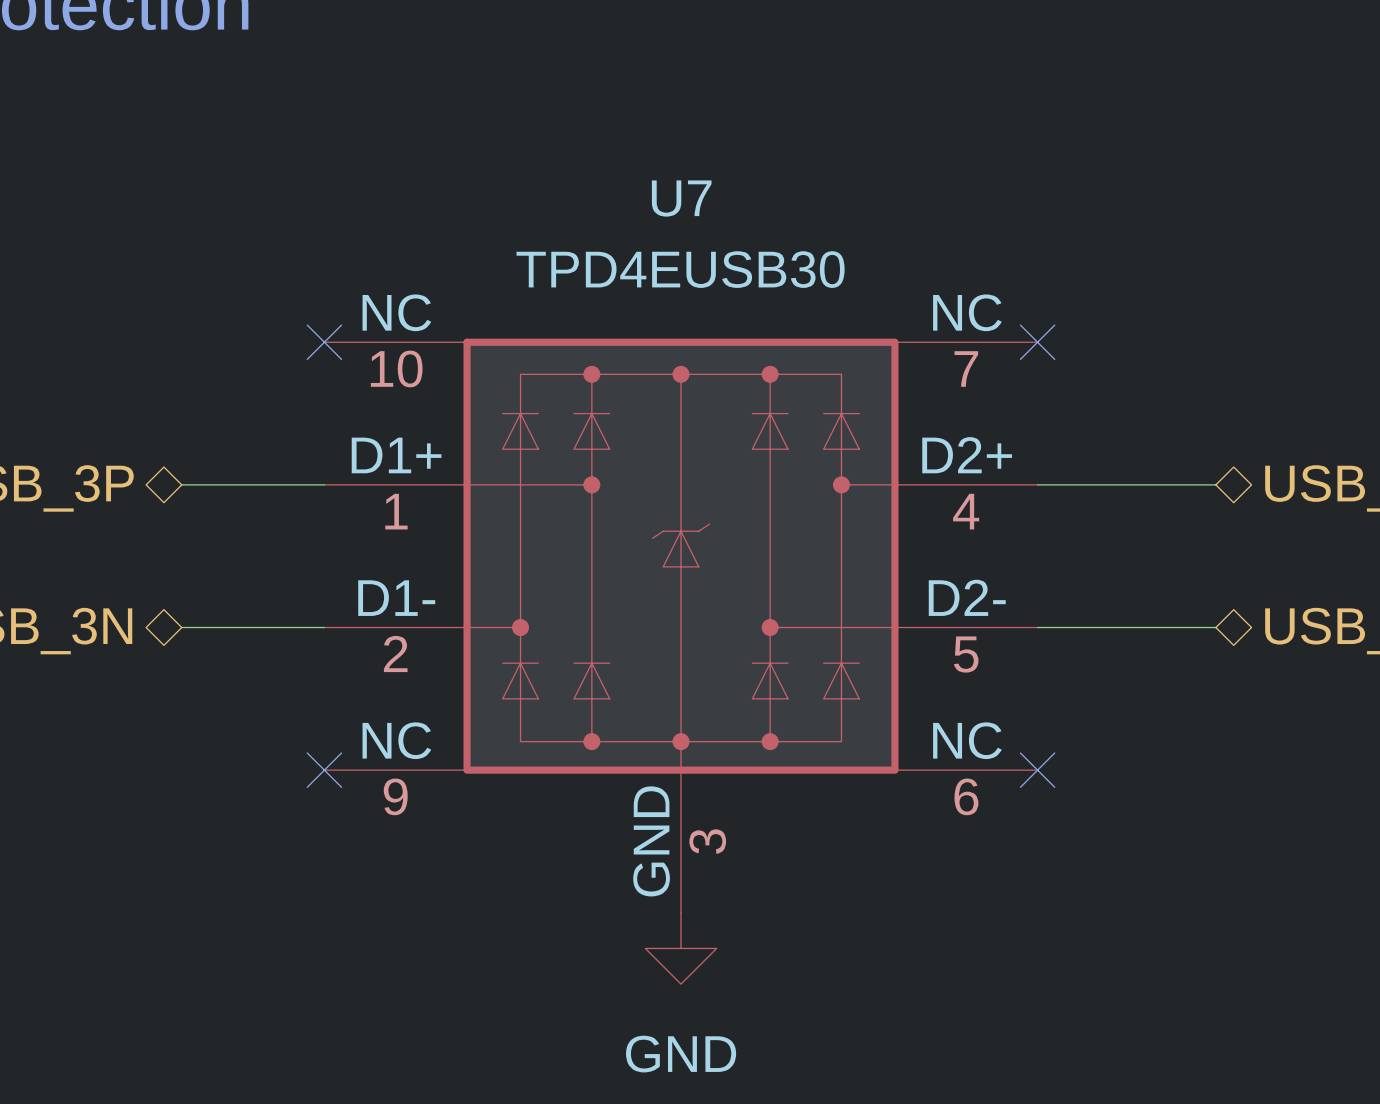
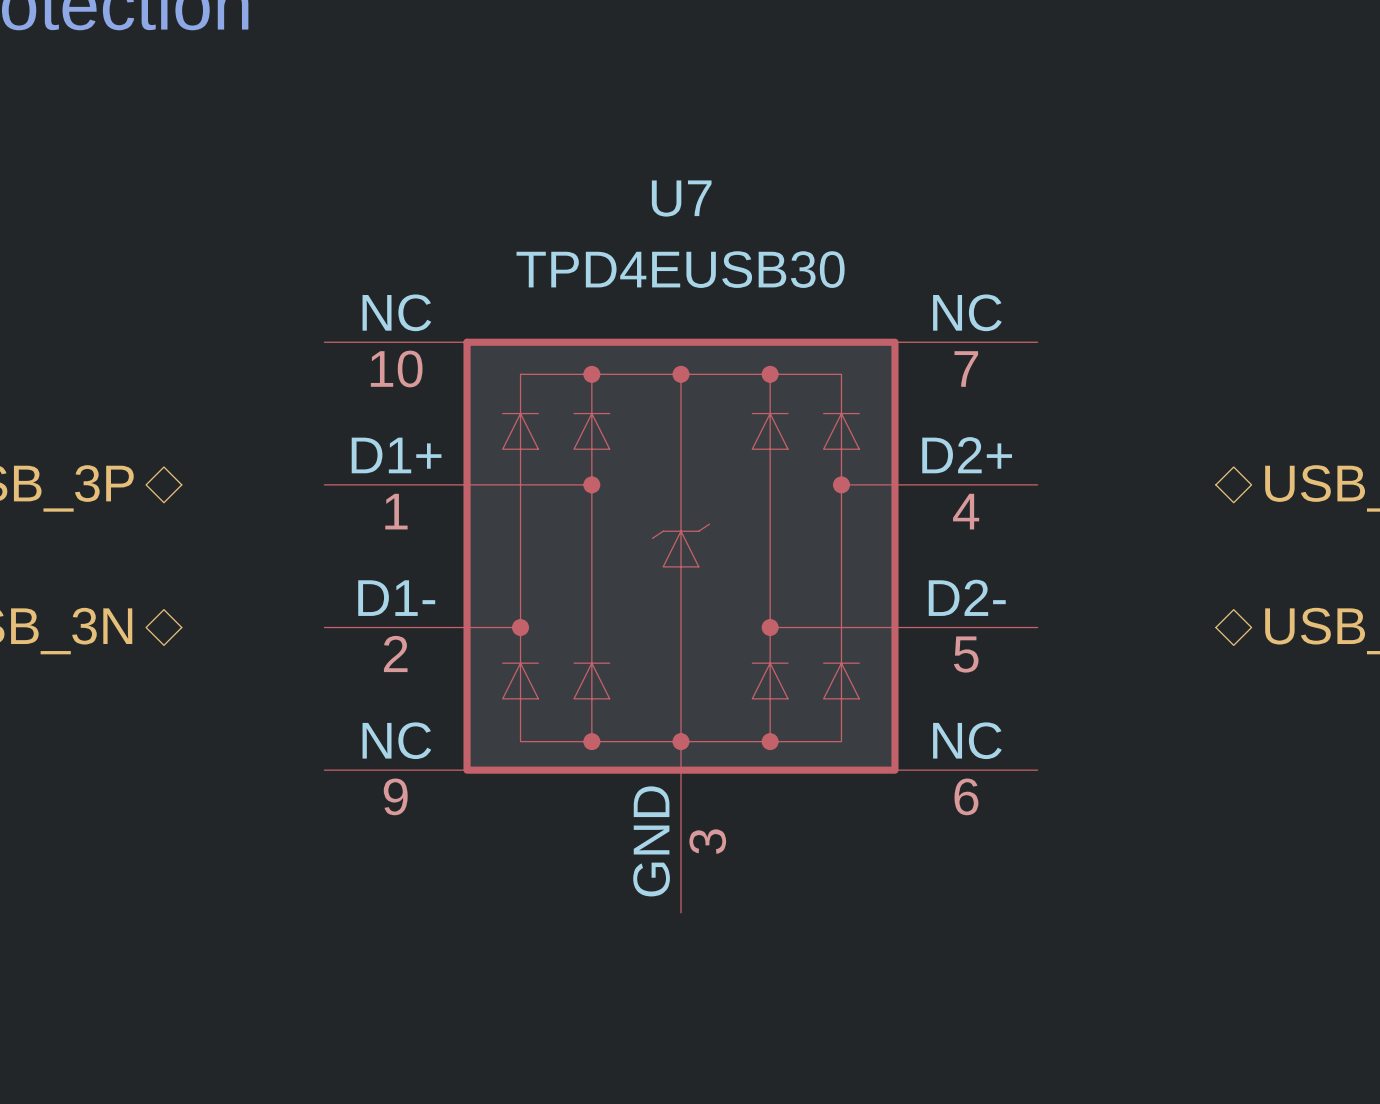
no-connect mark: (324, 342) -> none
no-connect mark: (1037, 342) -> none
wire: (181, 484) (324, 484) -> none
wire: (1037, 484) (1215, 484) -> none
wire: (181, 627) (324, 627) -> none
wire: (1037, 627) (1215, 627) -> none
no-connect mark: (324, 770) -> none
no-connect mark: (1037, 770) -> none
power symbol: GND (681, 948) -> none

